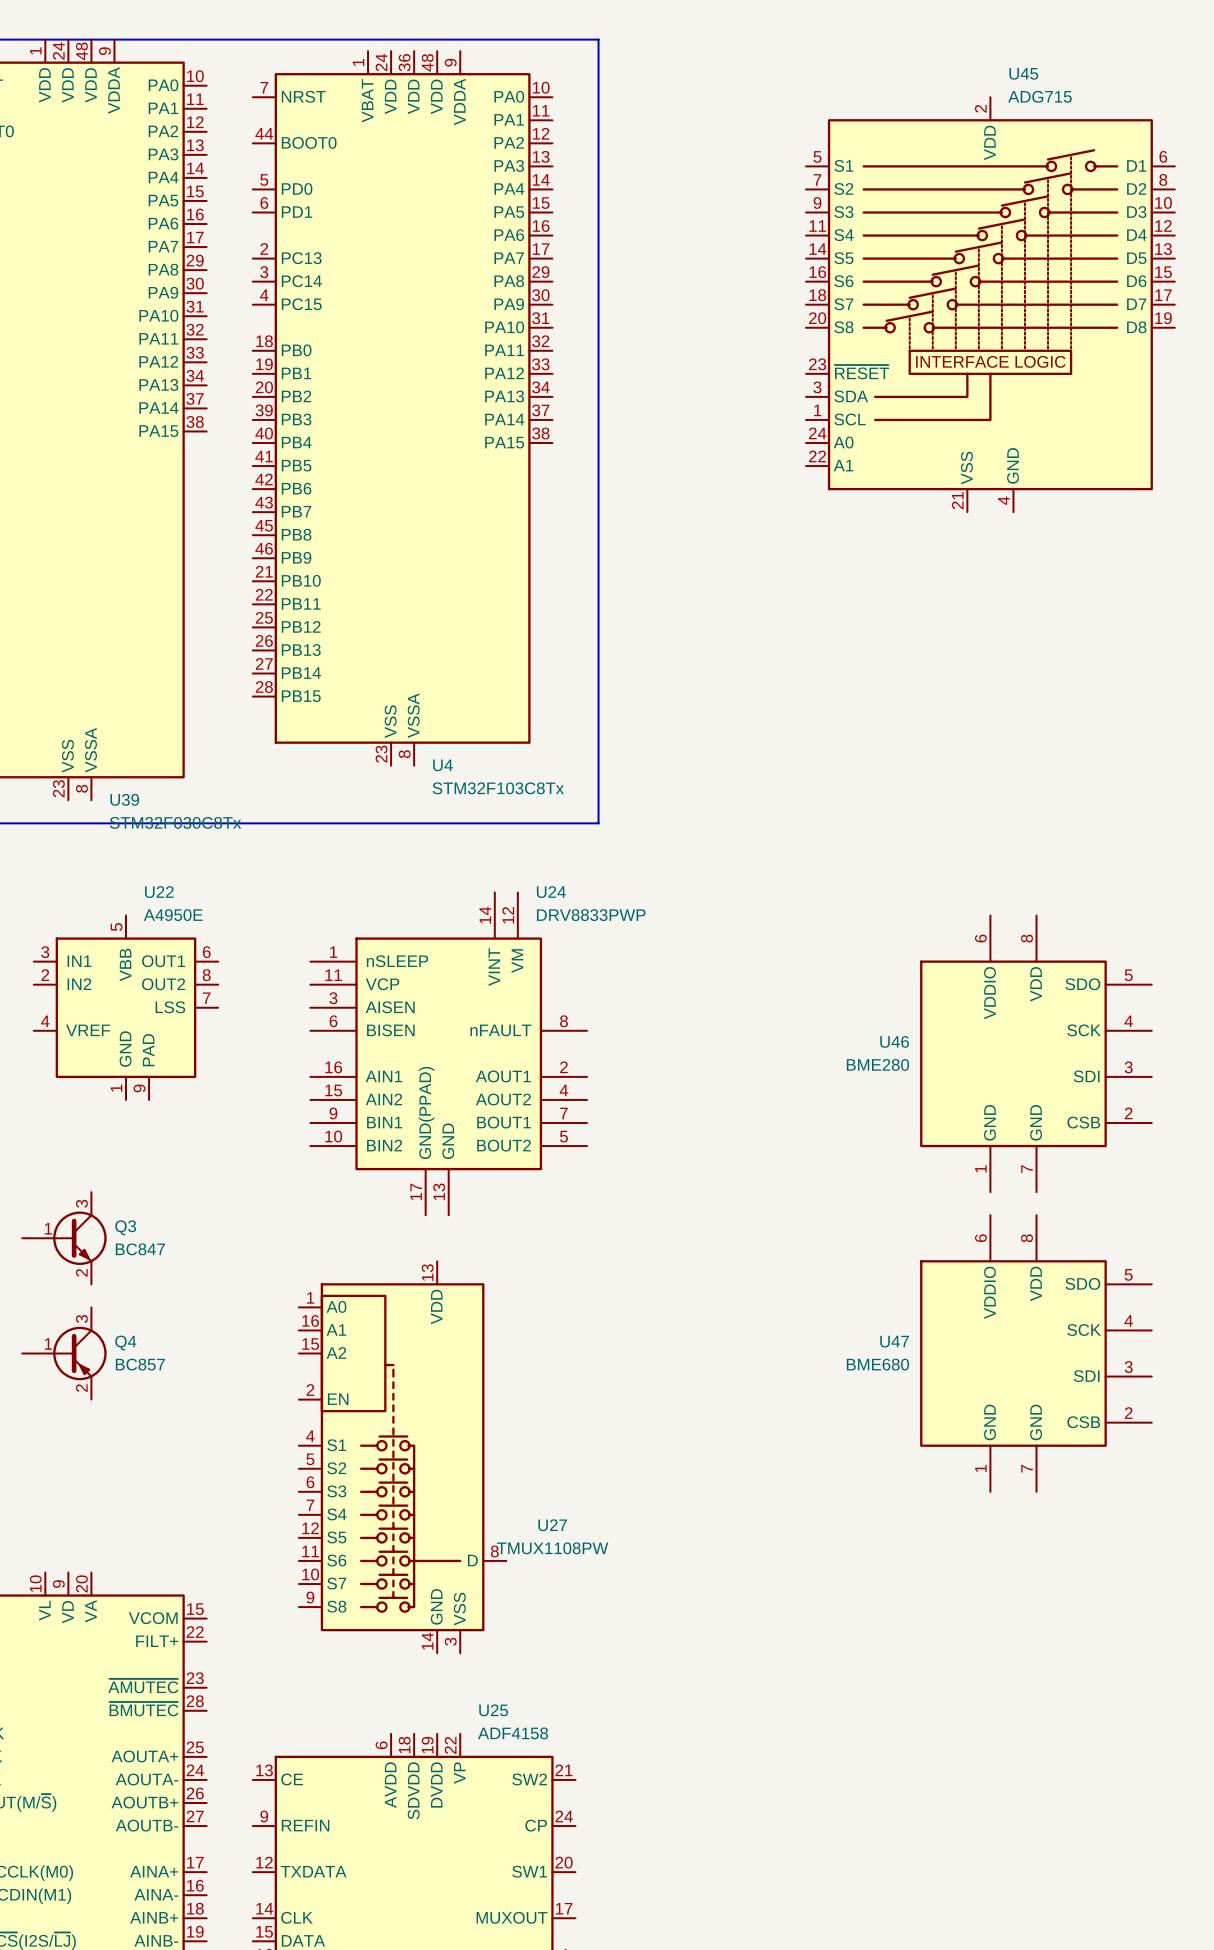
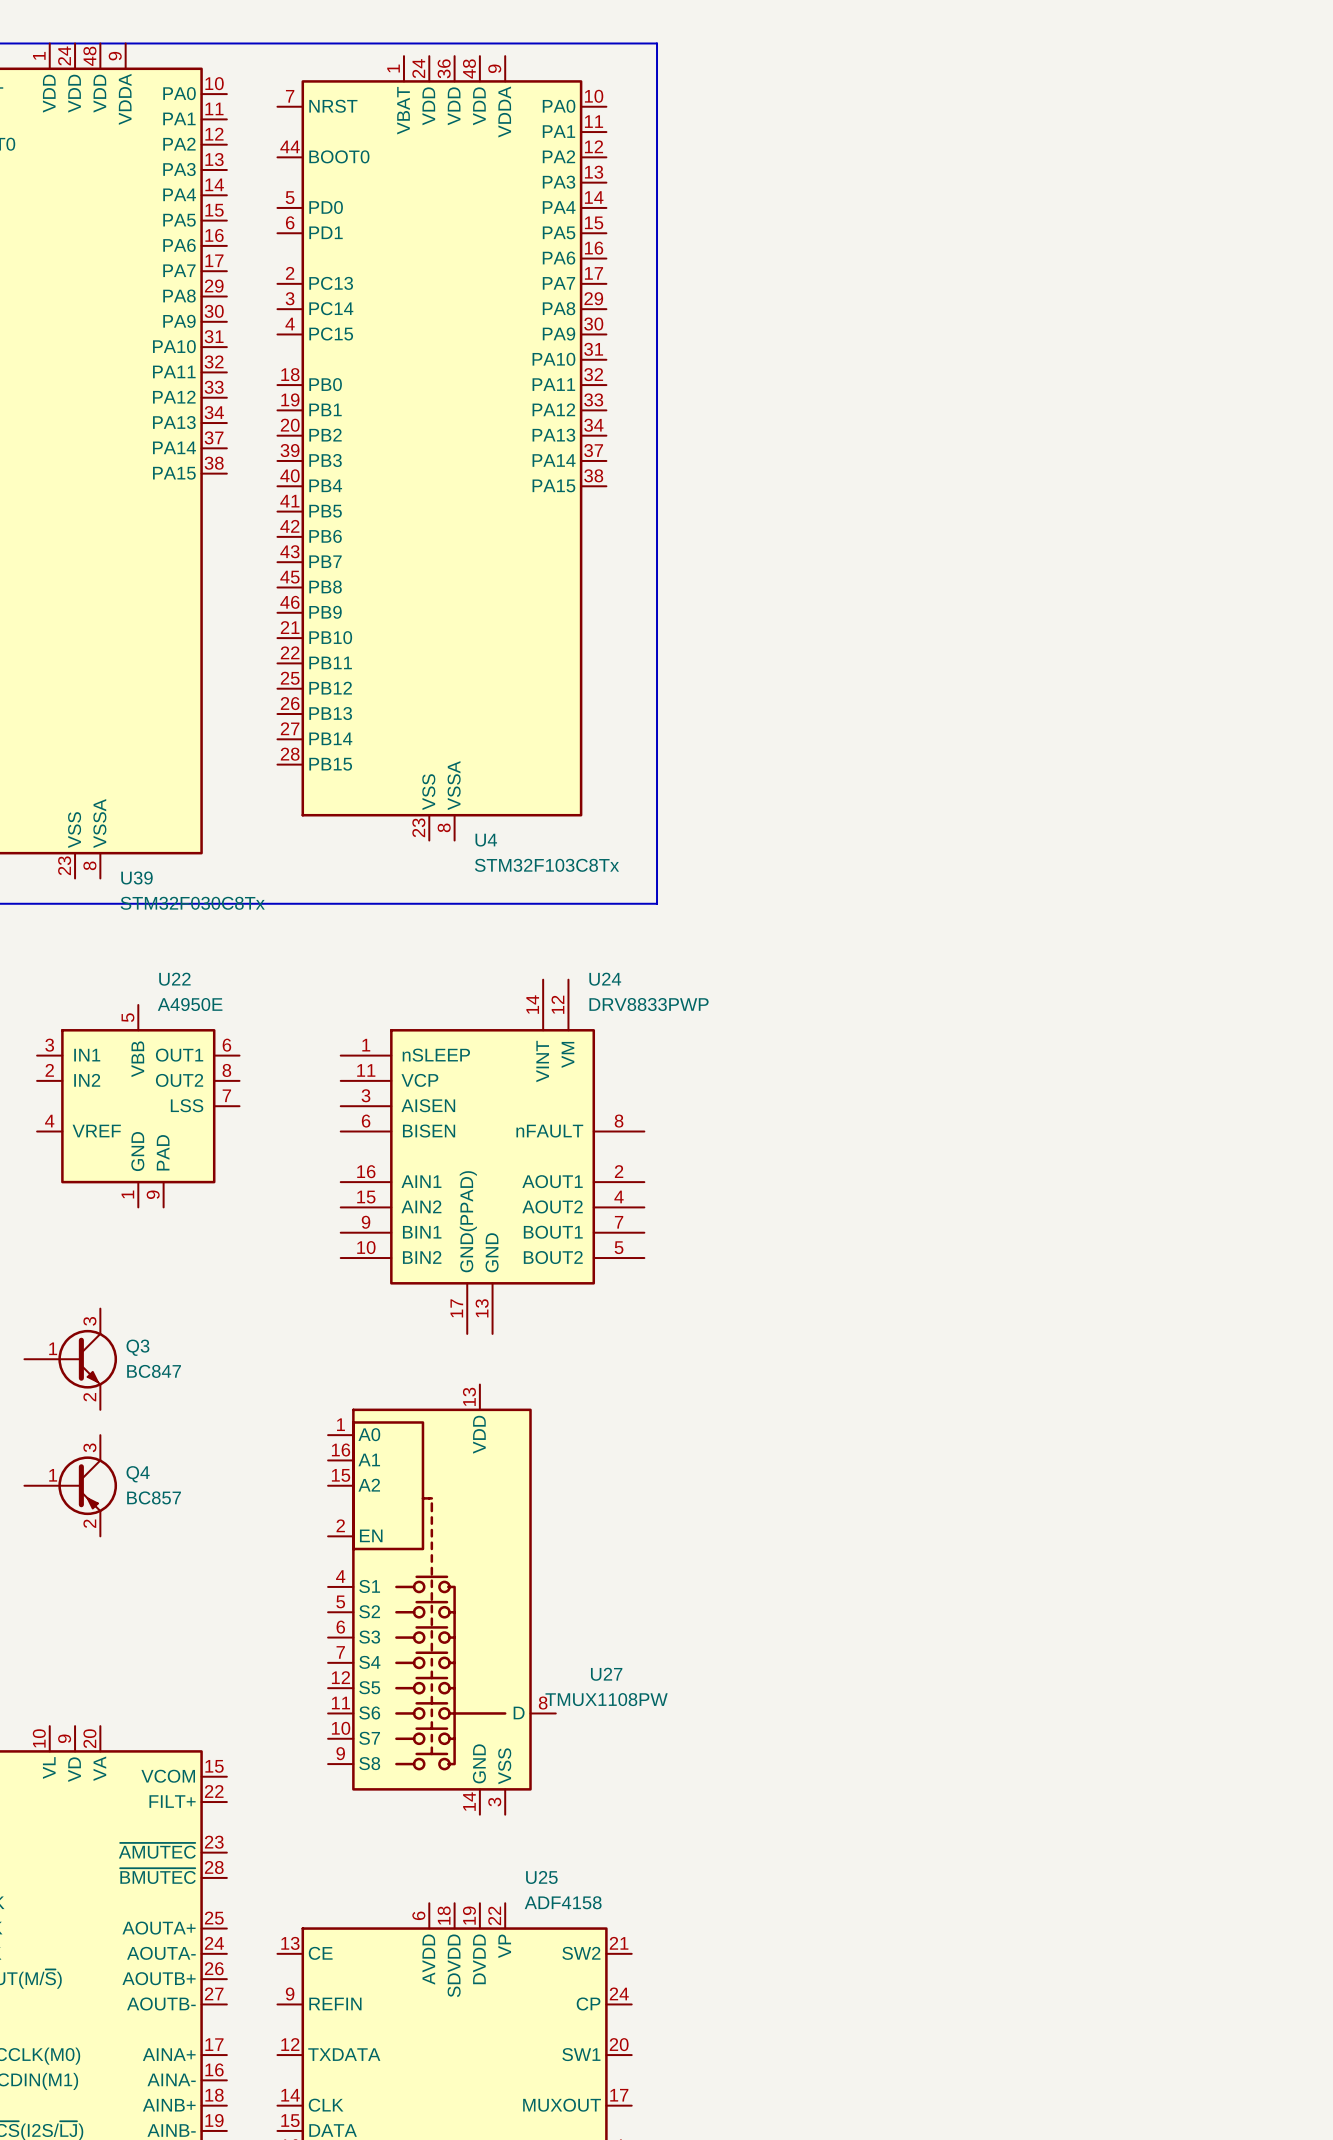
U45: ADG715 (990, 304) -> none
U46: BME280 (1035, 1053) -> none
U47: BME680 (1035, 1353) -> none

